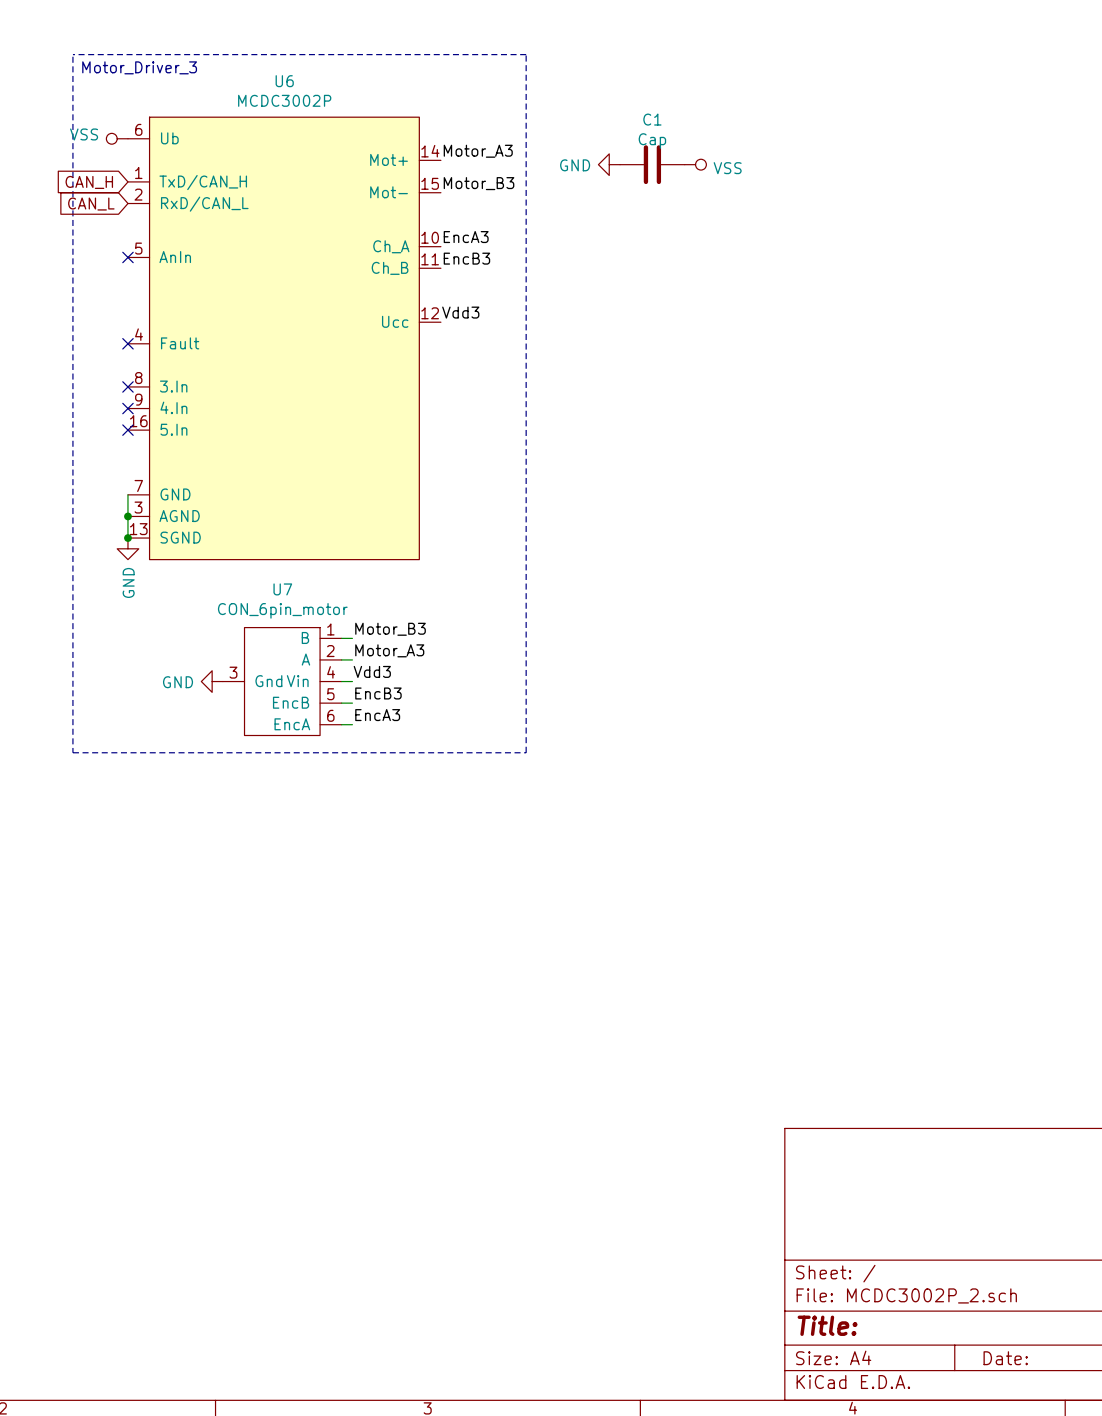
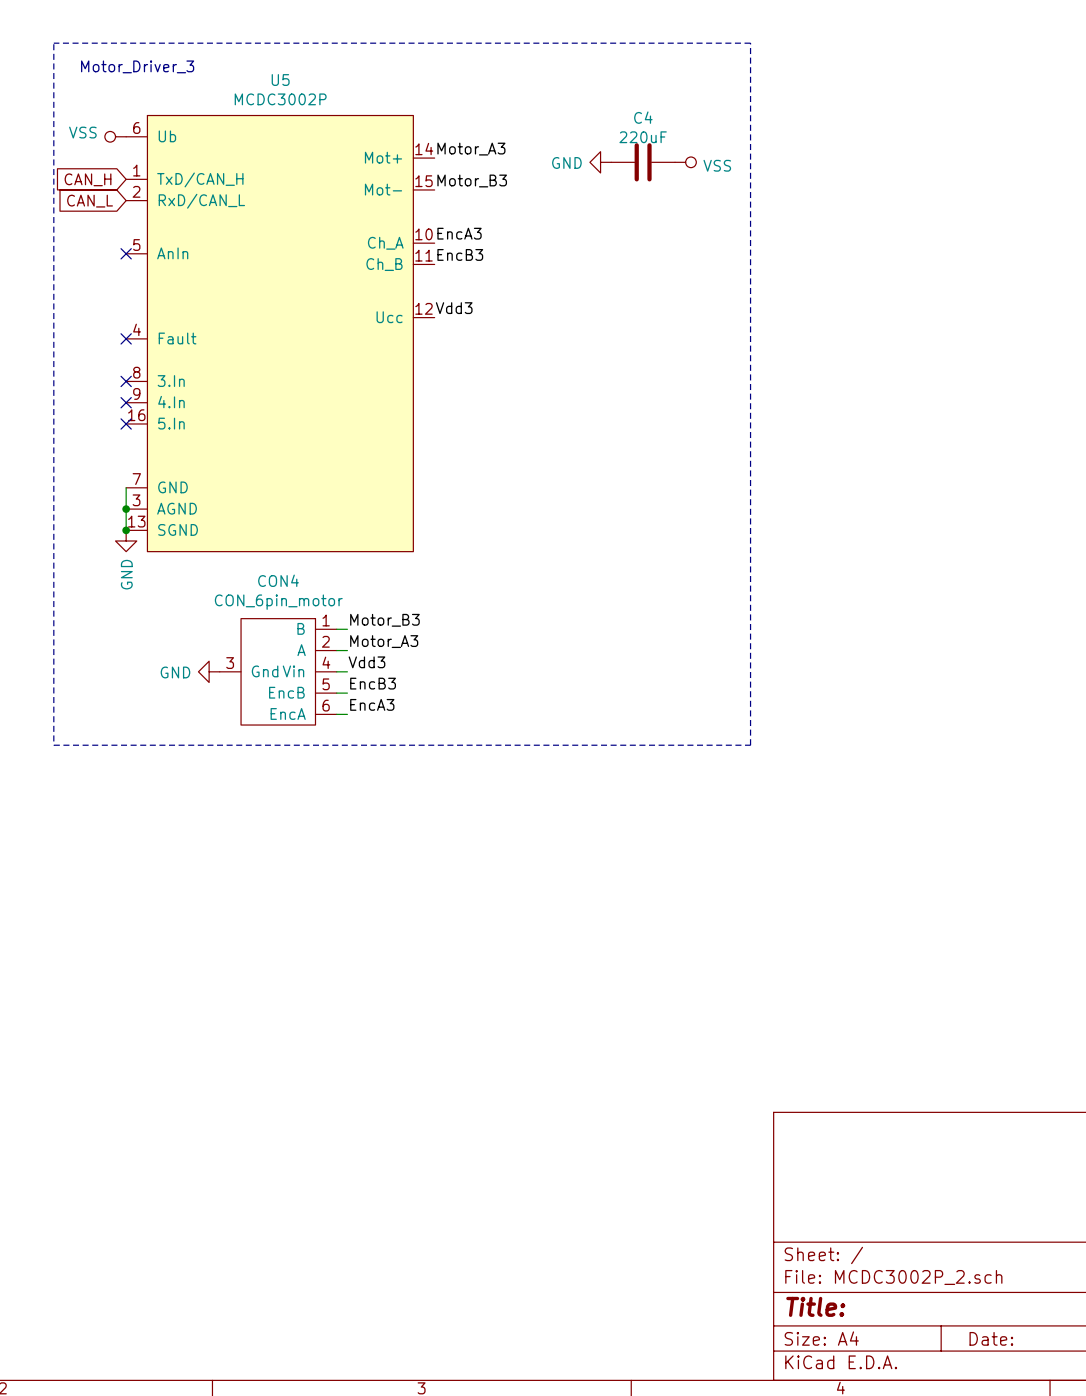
line: none -> (53, 43) (750, 43) (750, 745) (53, 745) (53, 44)
line: (72, 54) (526, 54) (526, 752) (72, 752) (72, 56) -> none
U6 name: U6 (284, 81) -> U5 (280, 80)
C1 name: C1 (652, 119) -> C4 (643, 117)
C1 value: Cap (652, 141) -> 220uF (643, 137)
U7 name: U7 (282, 589) -> CON4 (278, 580)

